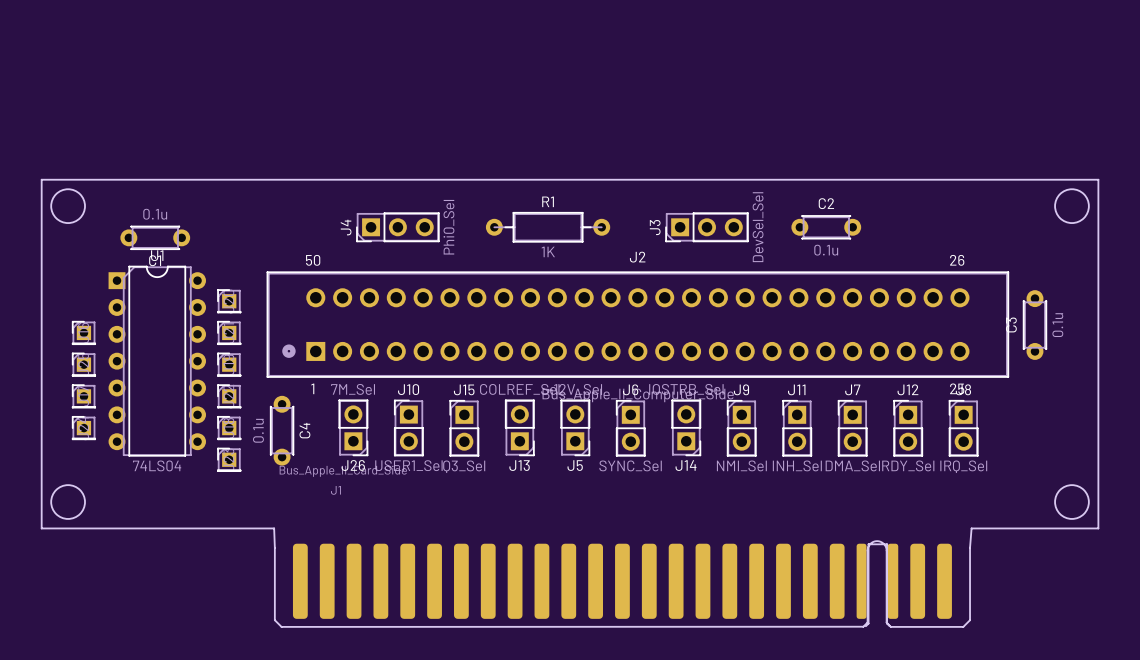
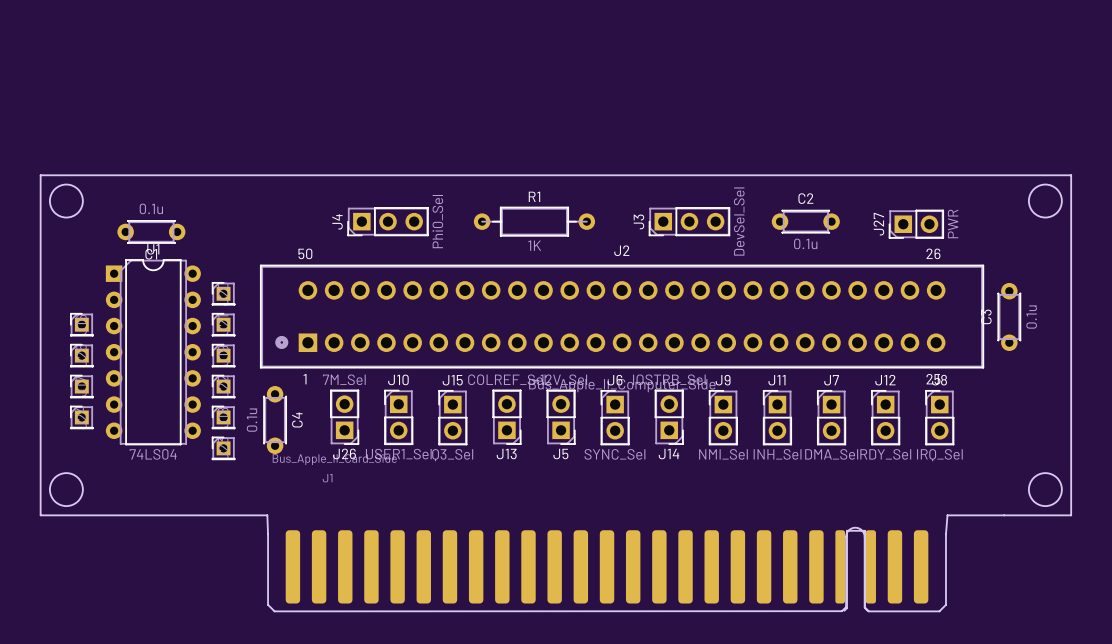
J27: none -> PWR (916, 224)

